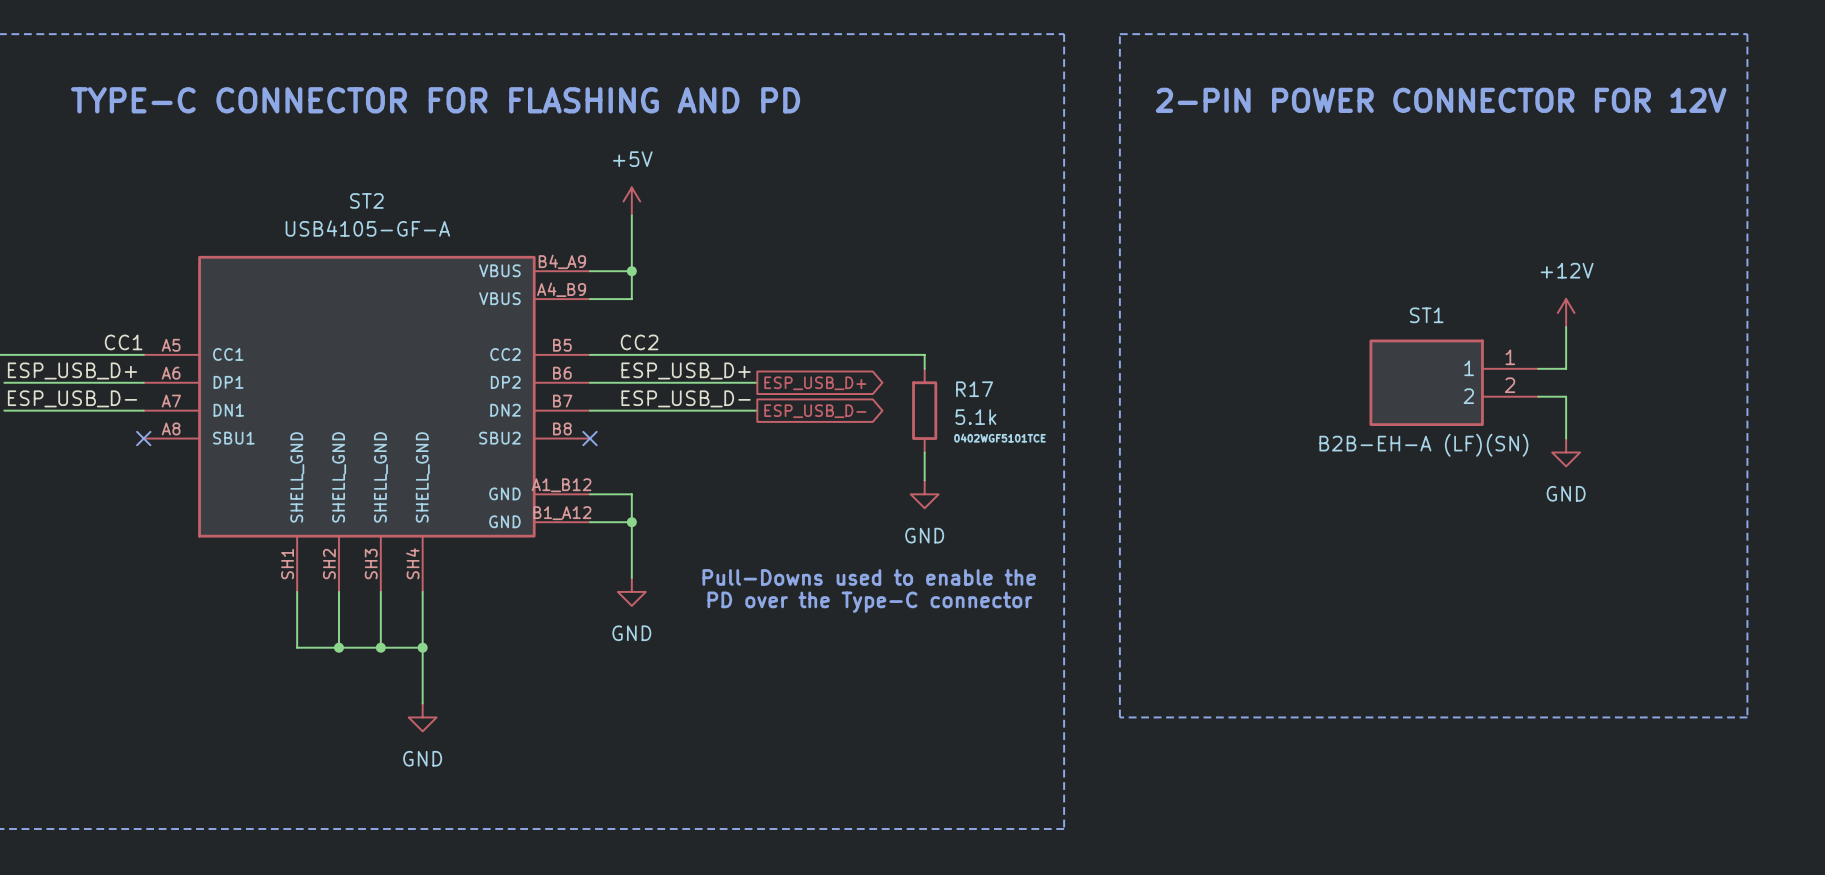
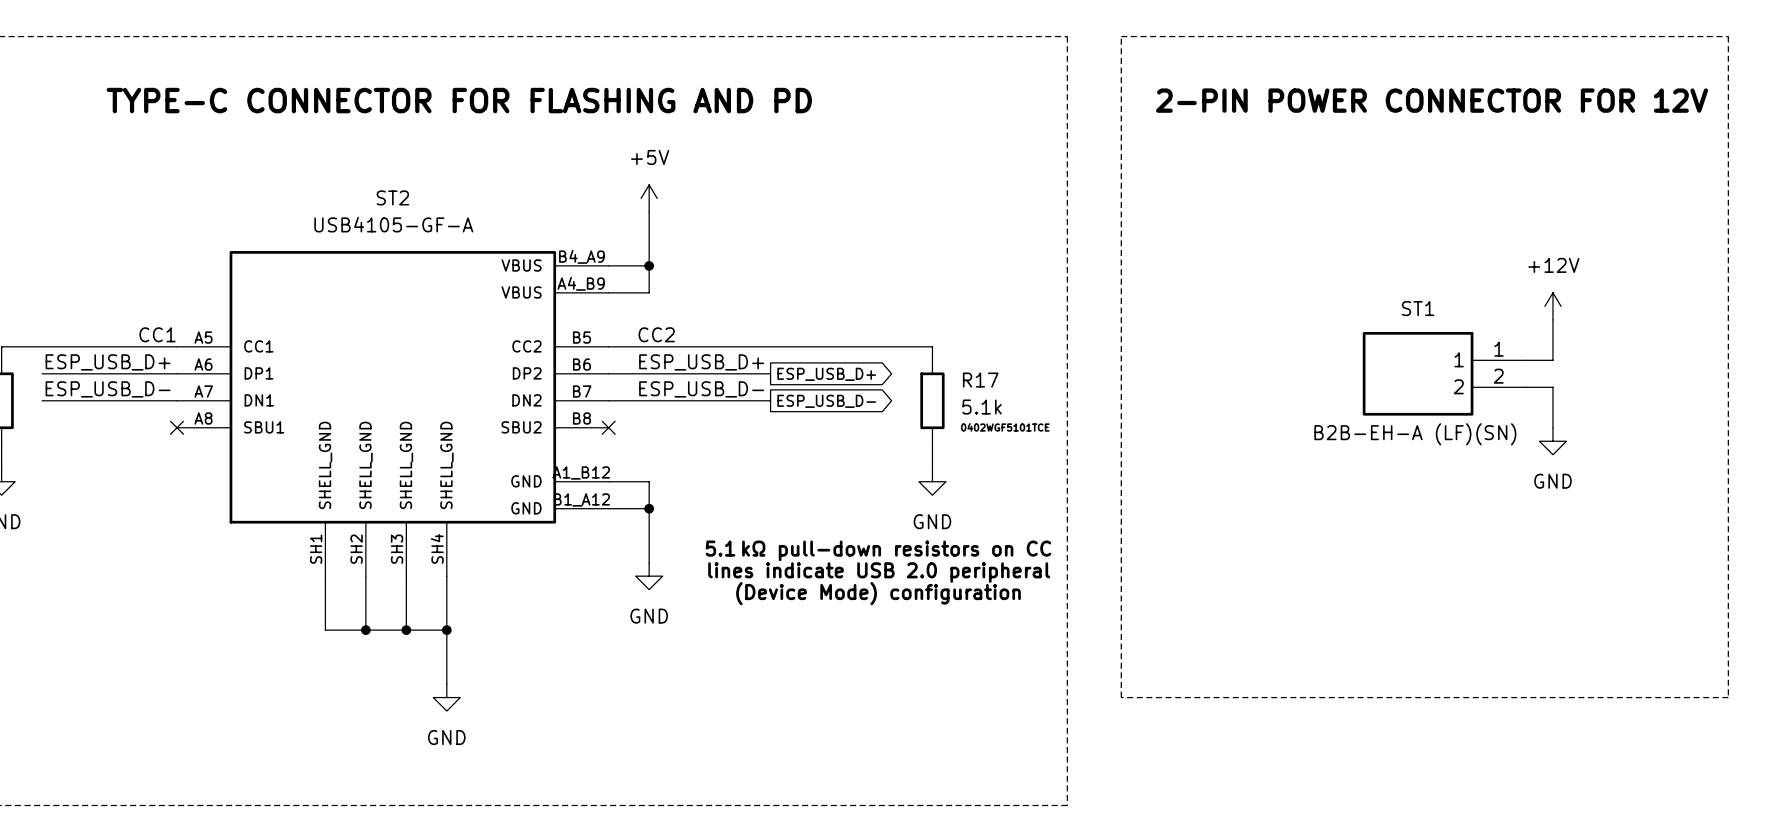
text: none -> 5.1 kΩ pull-down resistors on CC (878, 550)
text: Pull-Downs used to enable the (869, 577) -> none
text: none -> lines indicate USB 2.0 peripheral (879, 572)
text: PD over the Type-C connector (869, 602) -> none
text: none -> (Device Mode) configuration (878, 593)

